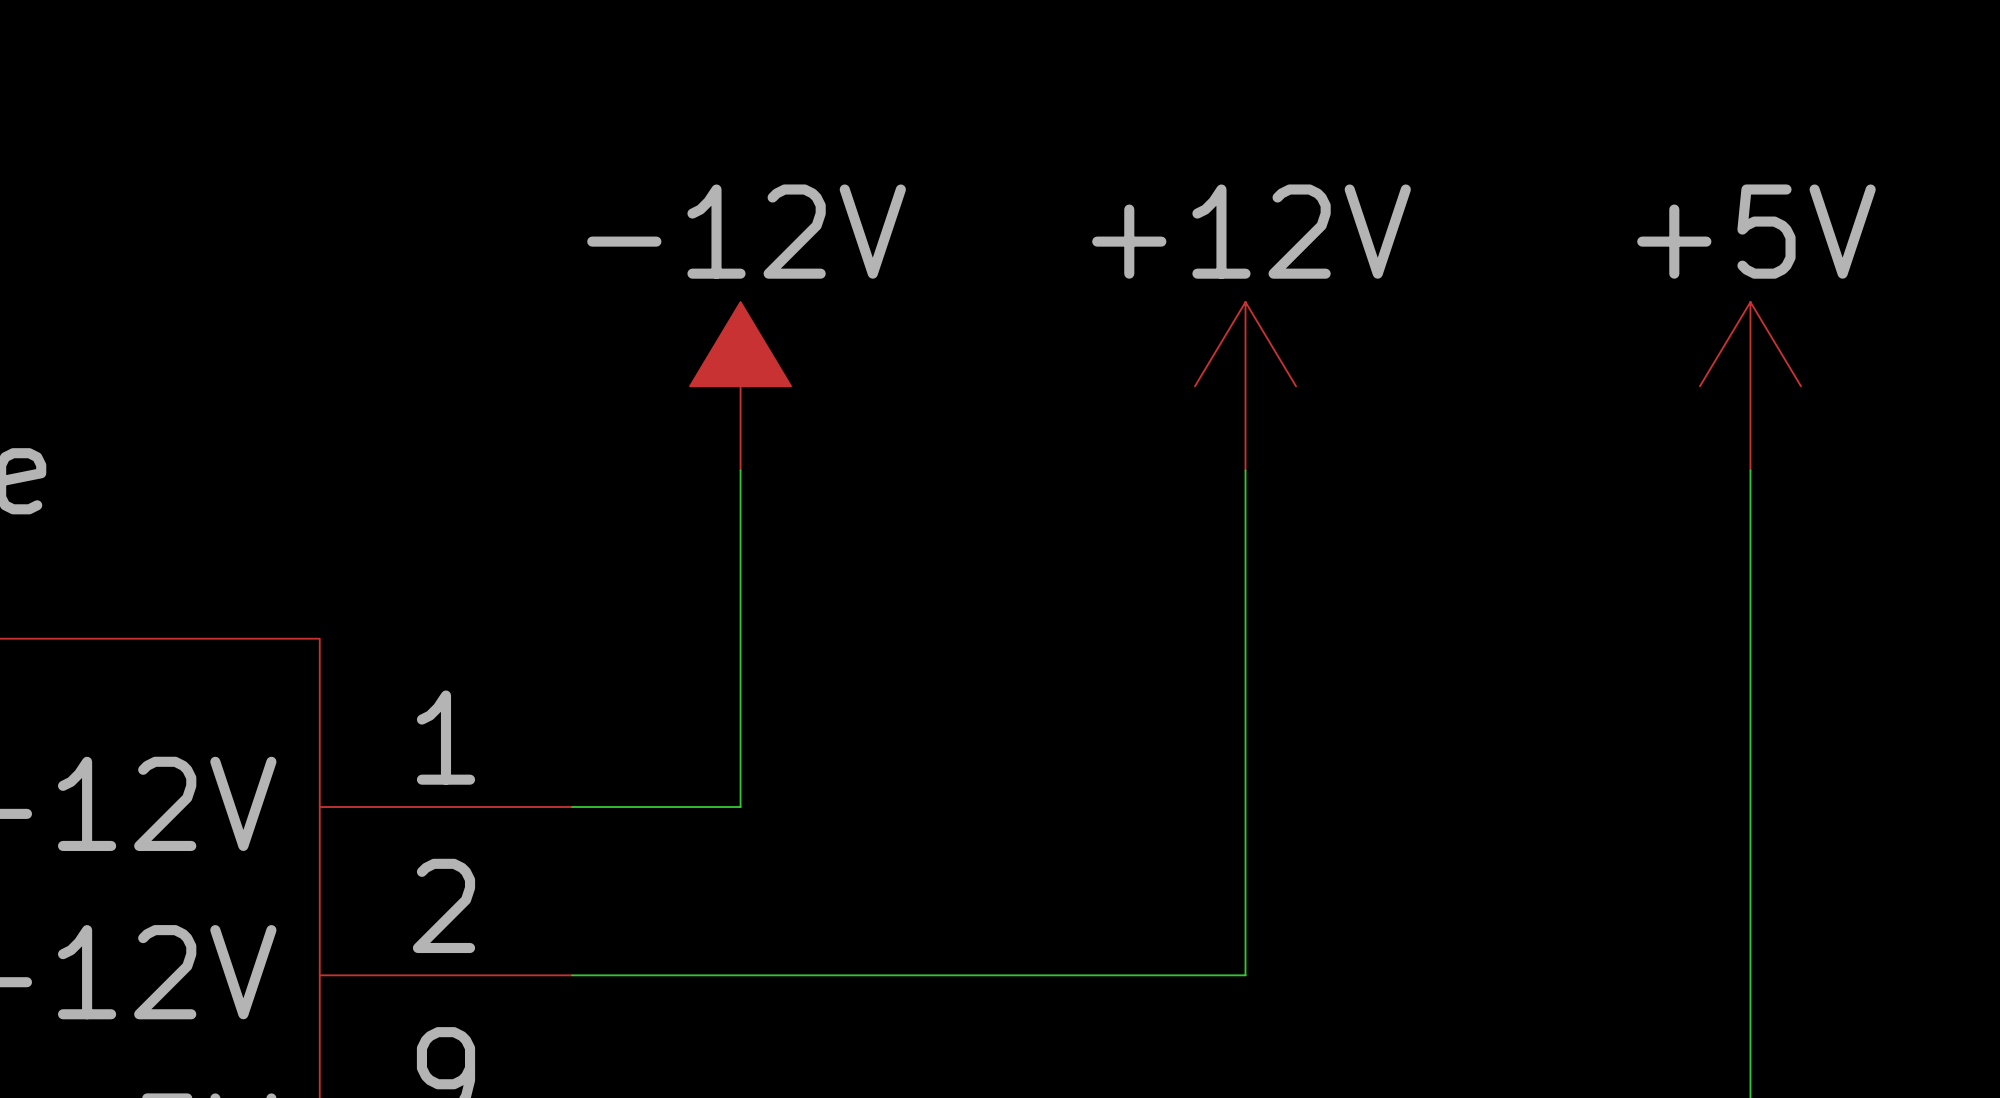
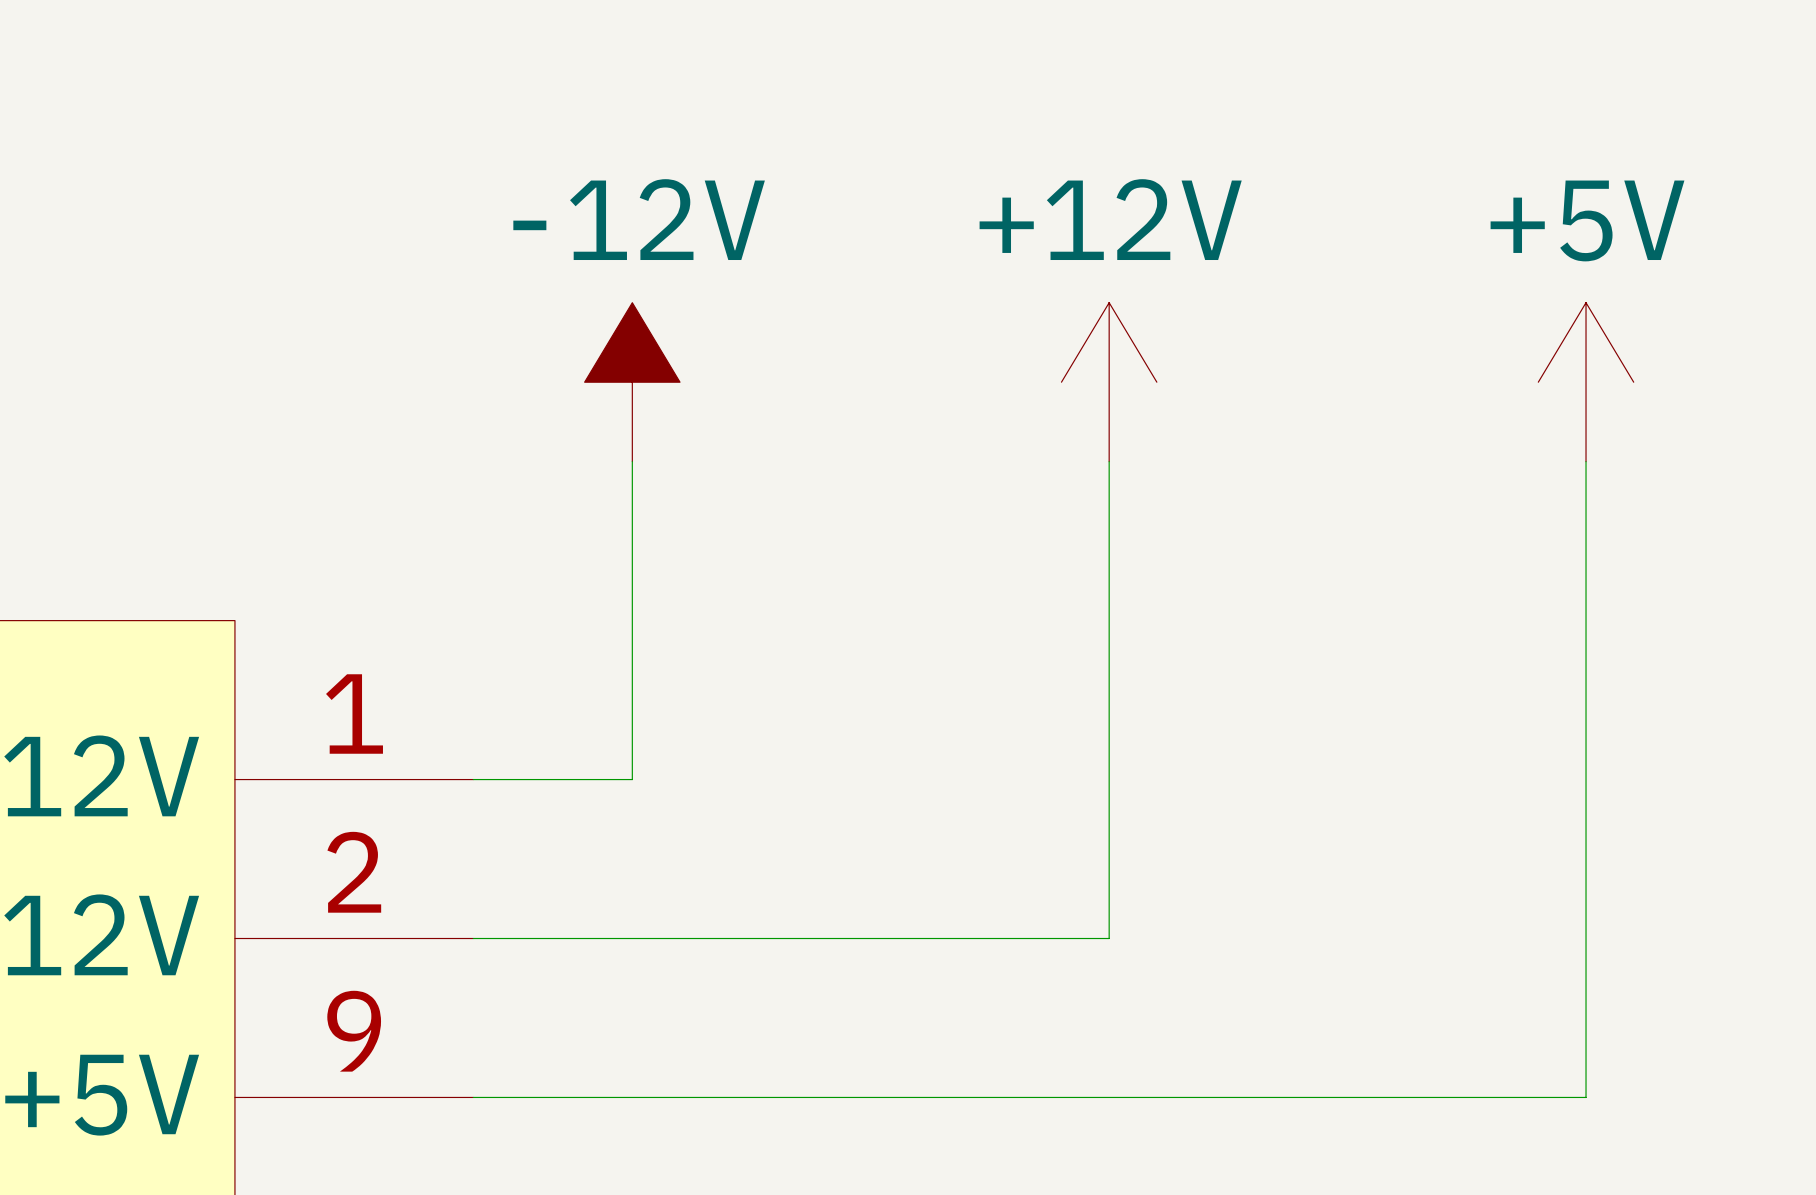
power symbol text position: -12V (746, 231) -> -12V (639, 219)
power symbol text position: +12V (1251, 231) -> +12V (1110, 219)
power symbol text position: +5V (1756, 231) -> +5V (1587, 220)

